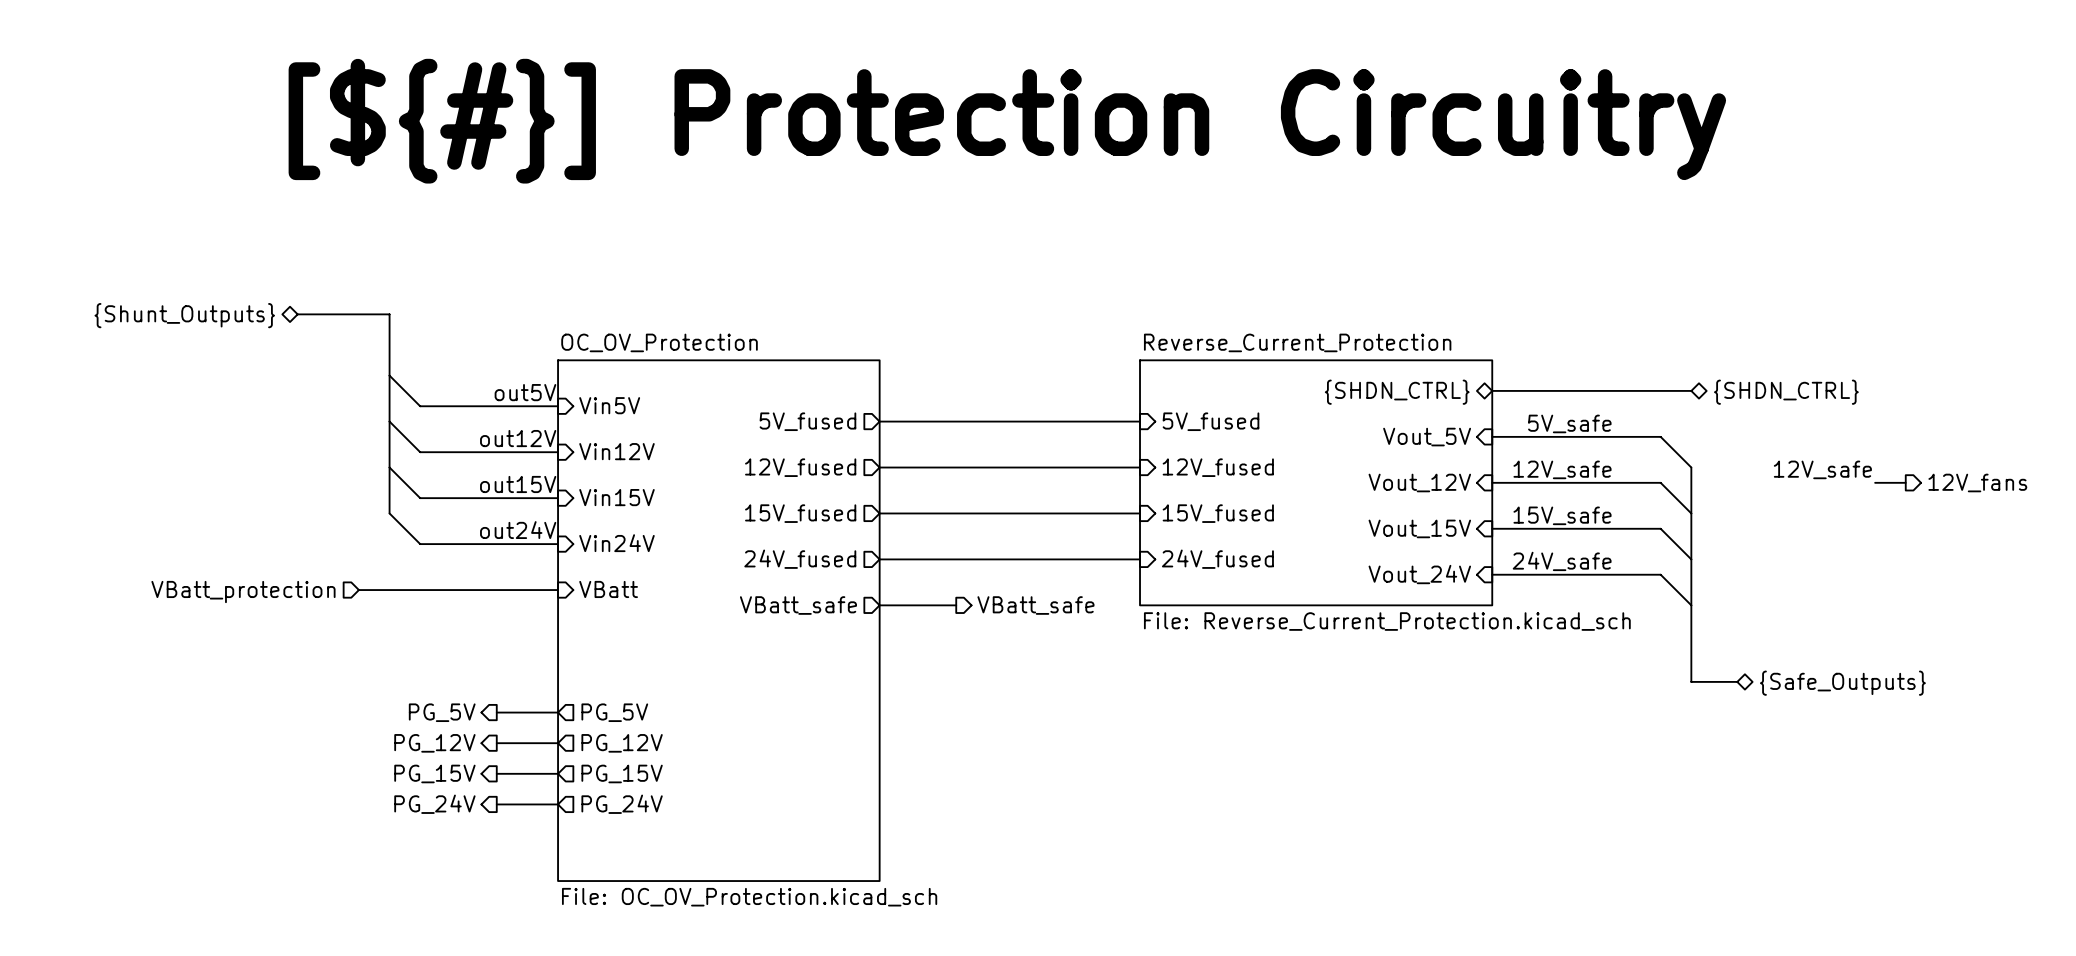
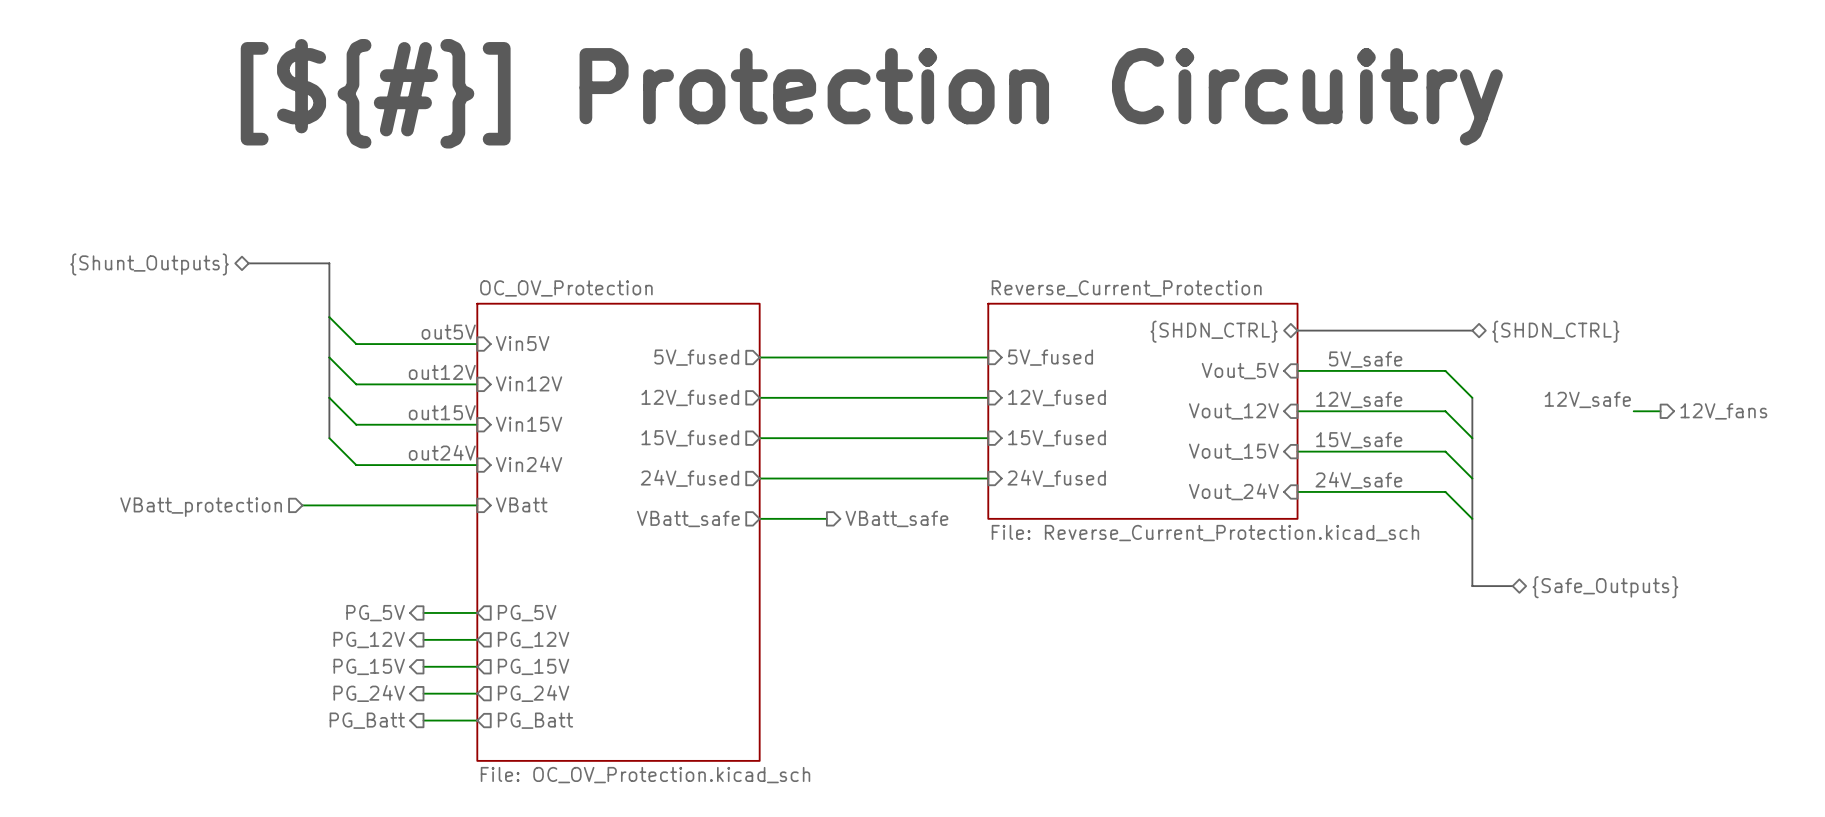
hierarchical label: none -> PG_Batt (367, 720)
wire: none -> (423, 720) (477, 720)
sheet pin: none -> PG_Batt (535, 720)

